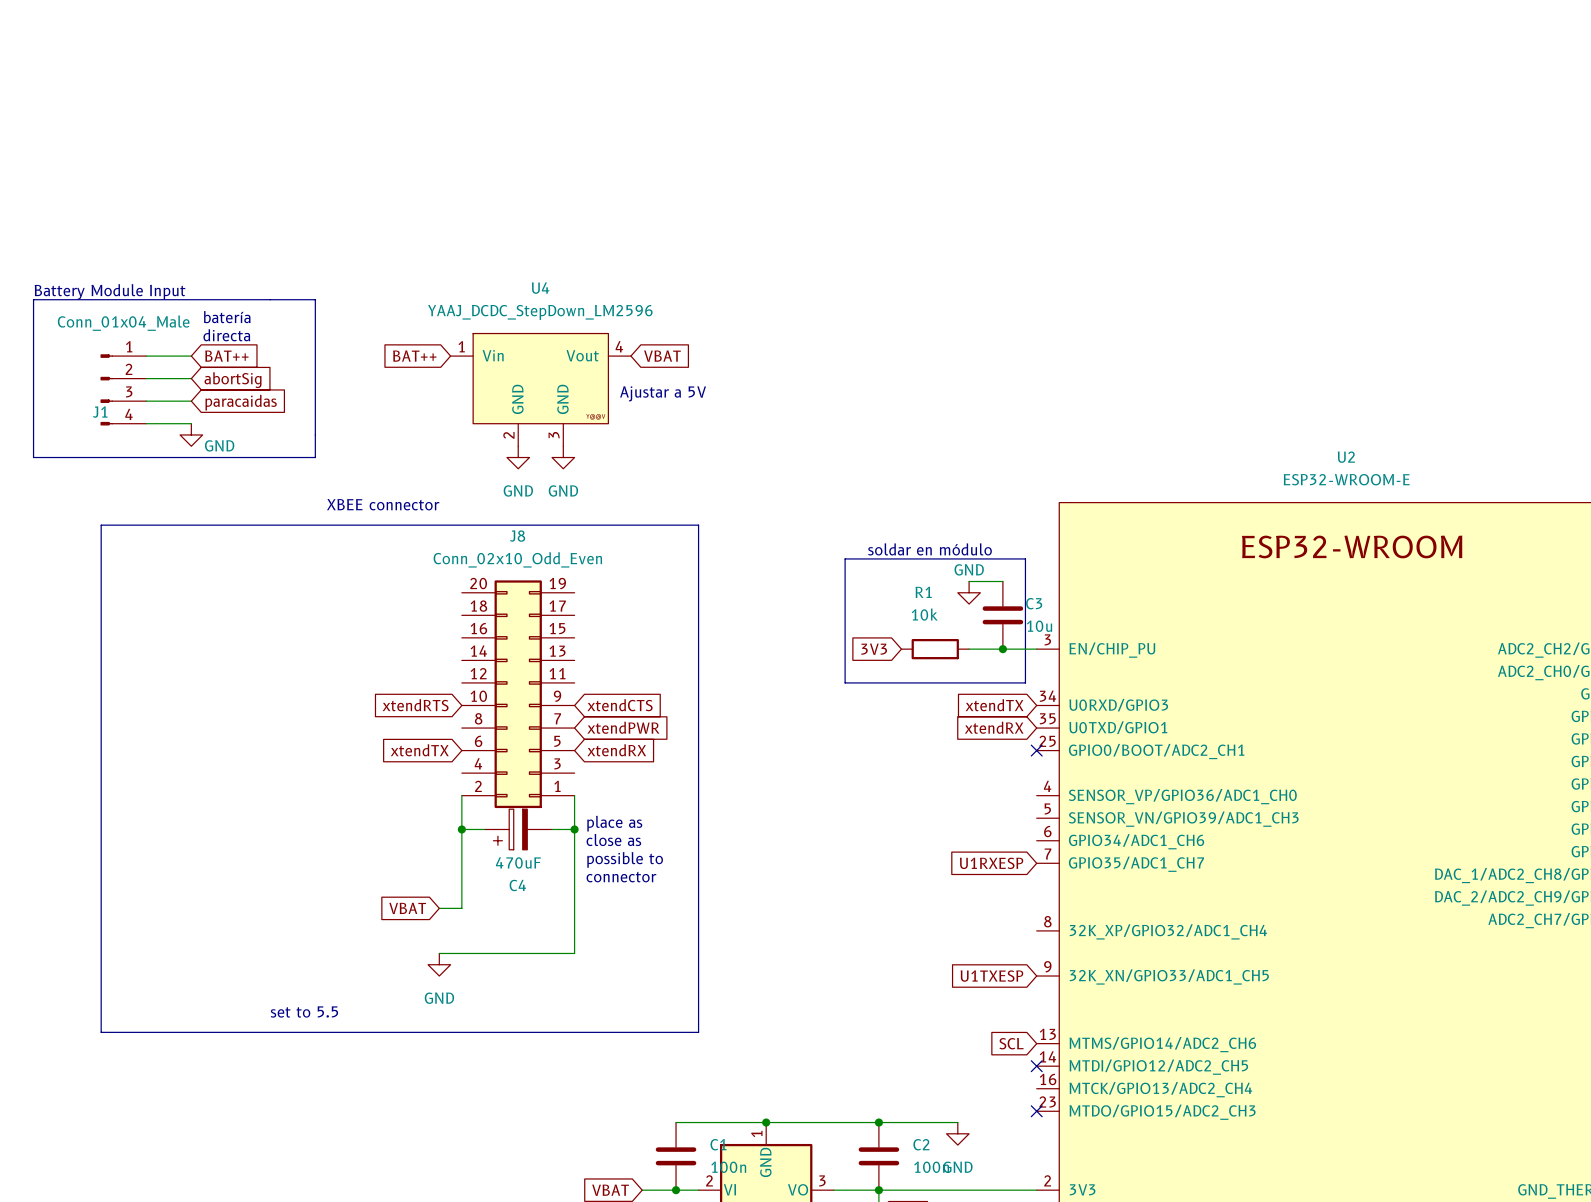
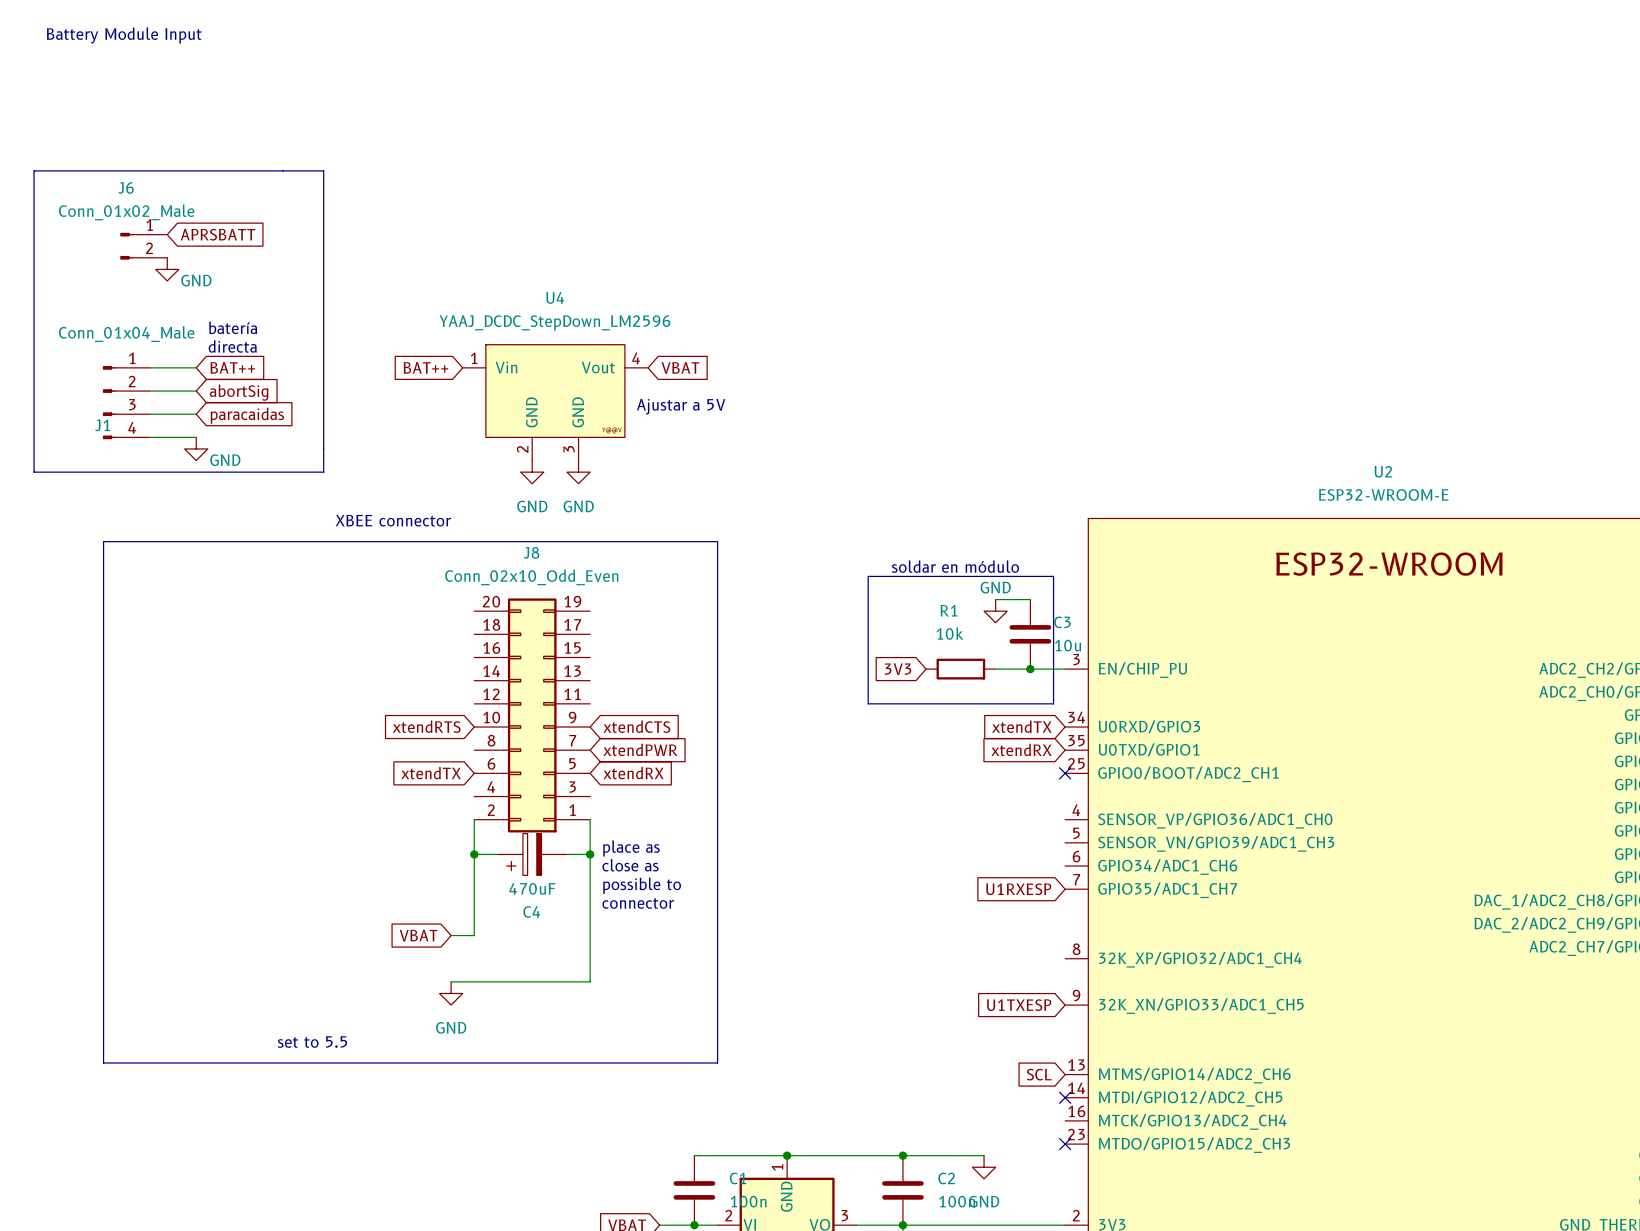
text: none -> Battery Module Input (124, 35)
global label: none -> APRSBATT (217, 234)
J6: none -> Conn_01x02_Male (143, 246)
power symbol: none -> GND (167, 269)
text: Battery Module Input (110, 291) -> none
line: (33, 299) (315, 299) -> (34, 309) (34, 170) (323, 170) (323, 309)

